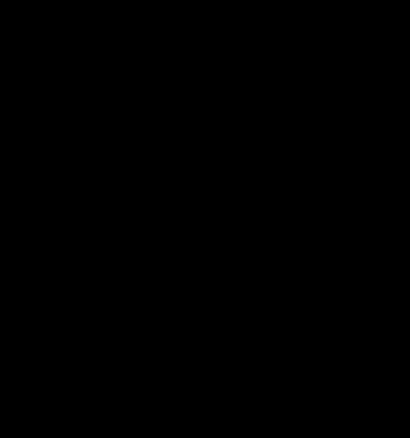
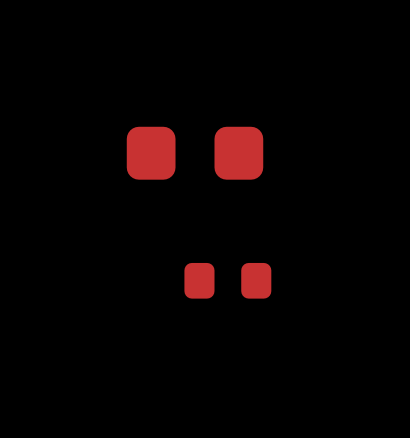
part: none -> (195, 153)
part: none -> (227, 280)

